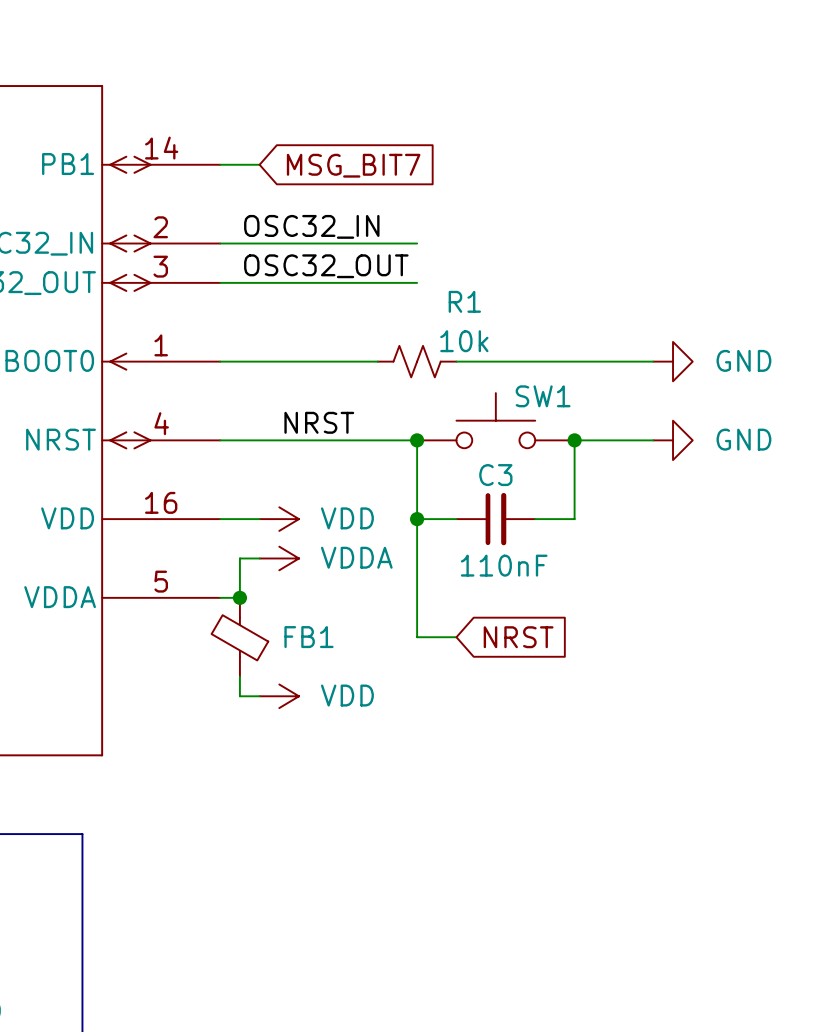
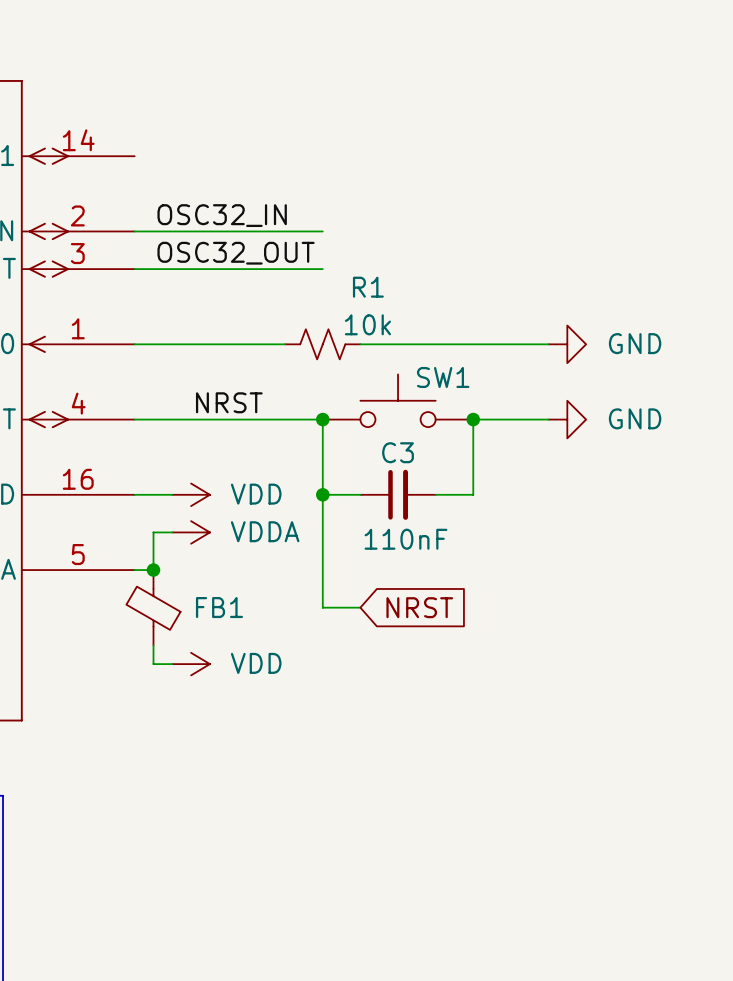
wire: (220, 164) (259, 164) -> none
global label: MSG_BIT7 (353, 165) -> none

